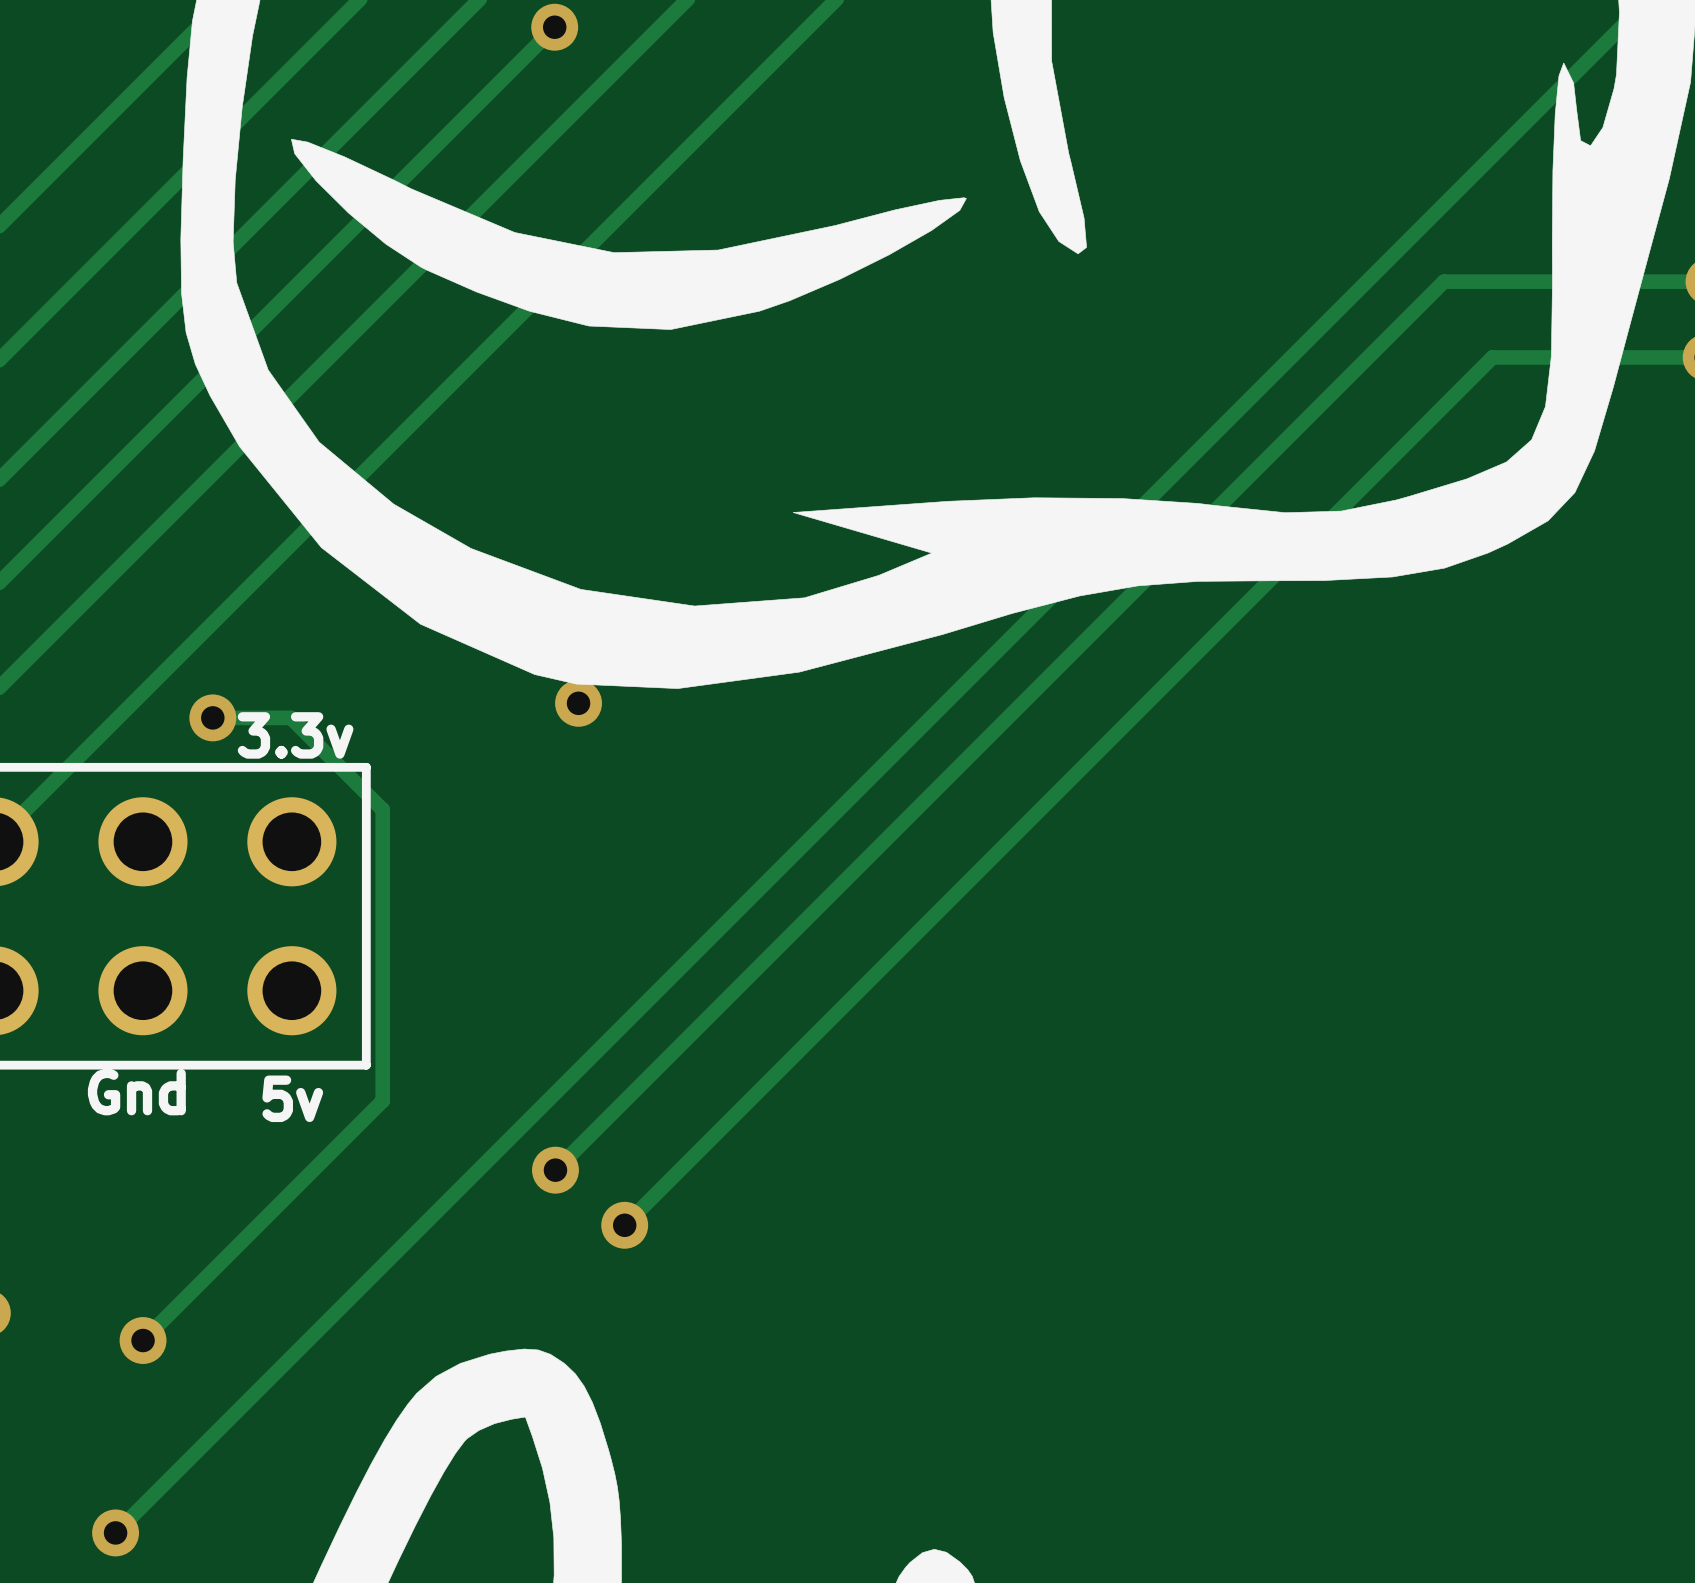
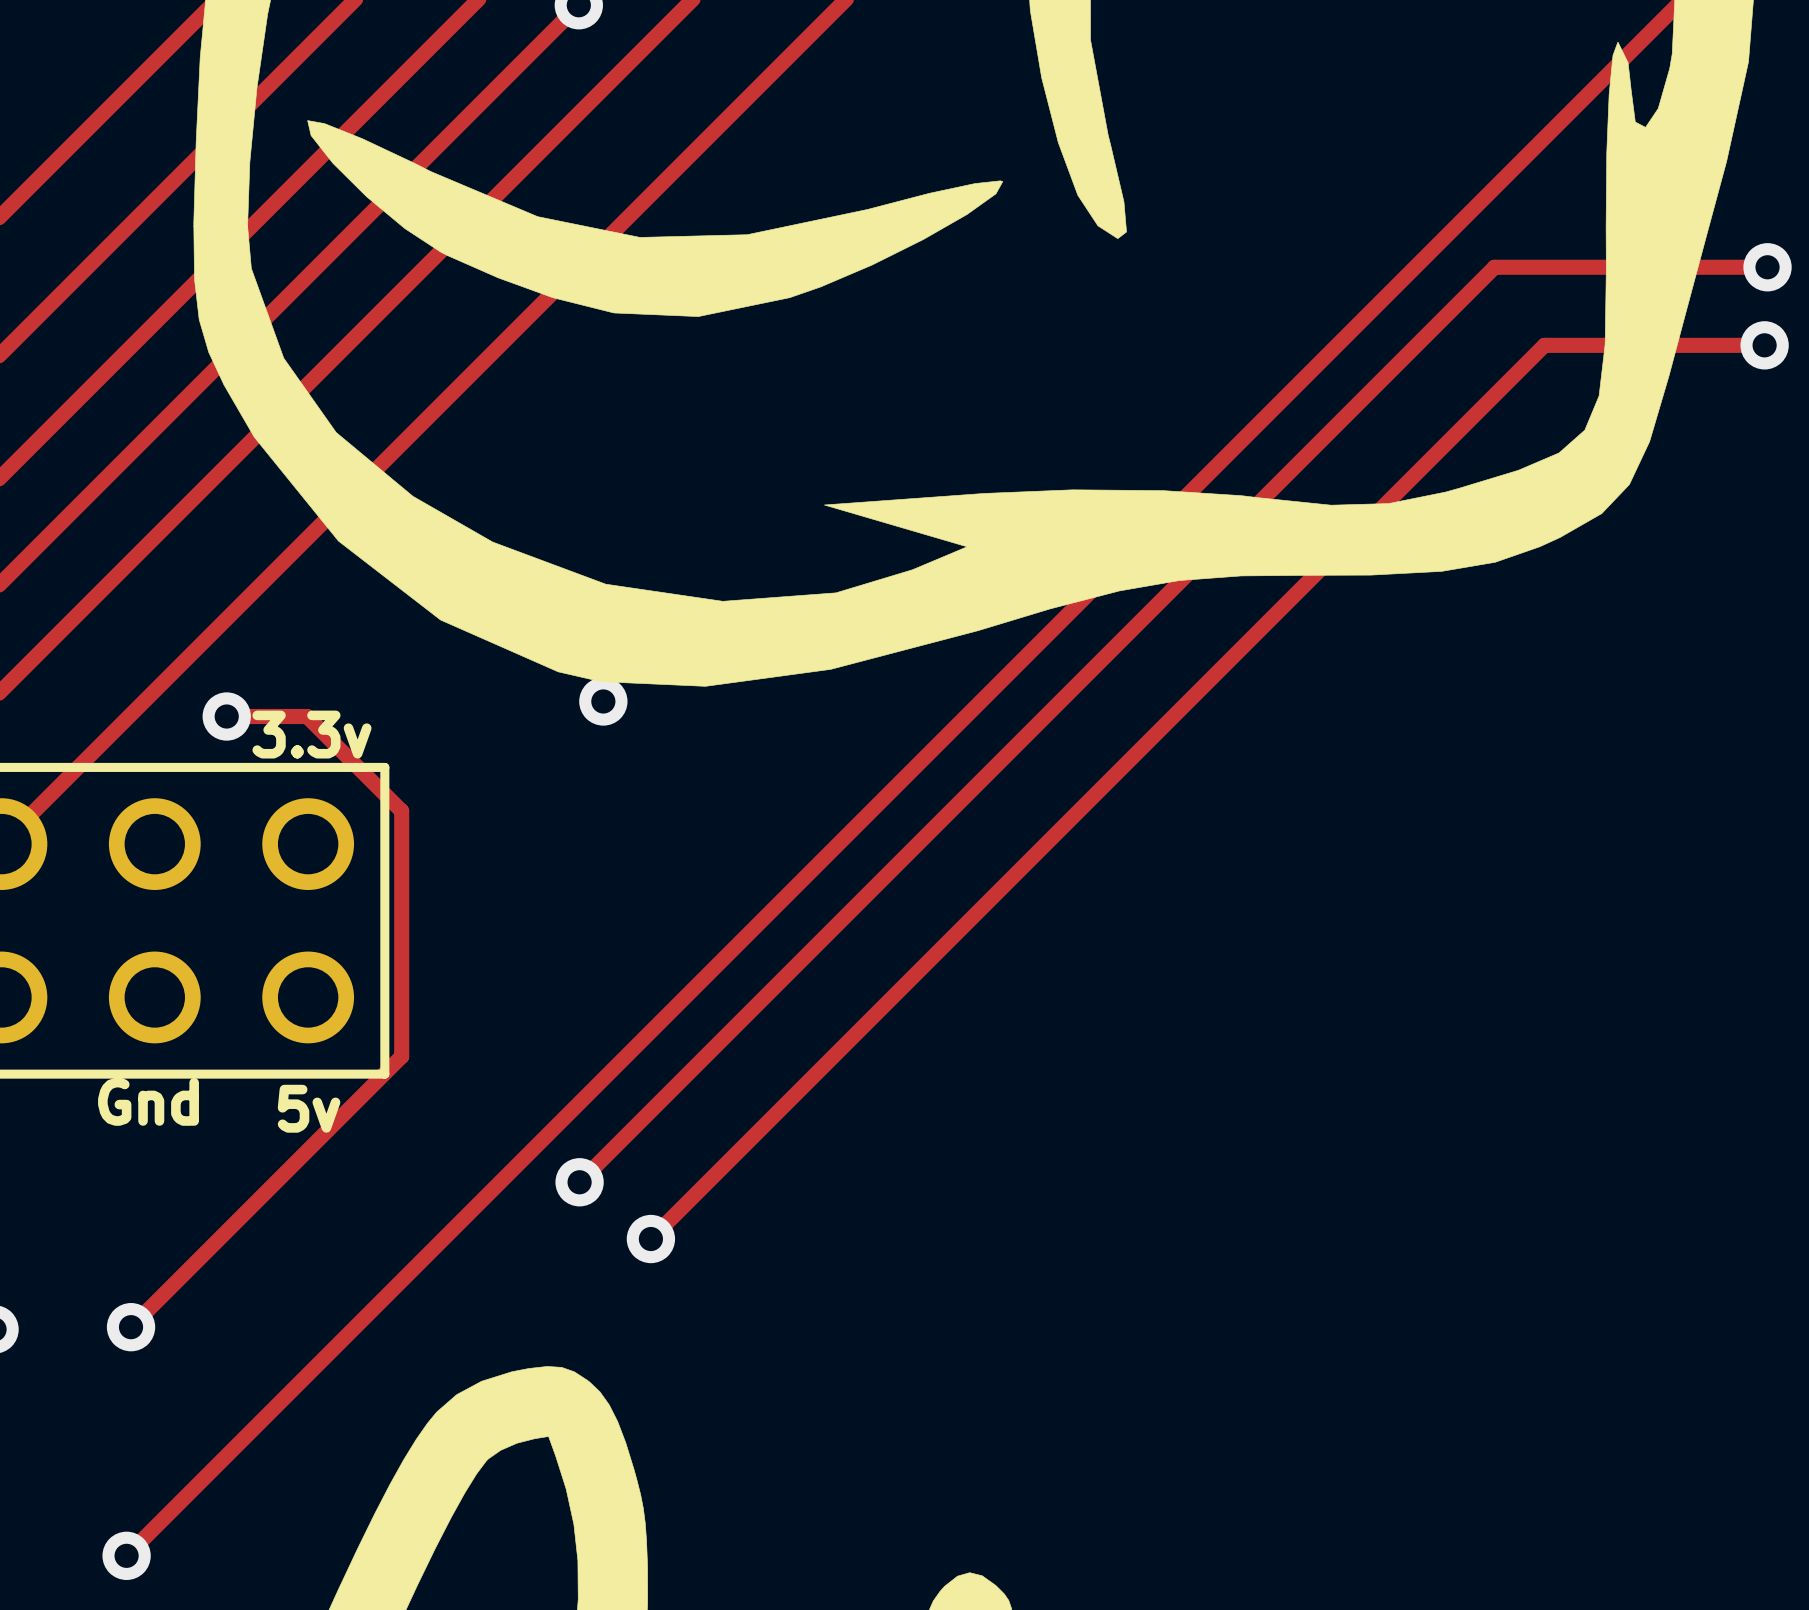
track: (382, 1048) (382, 1100) (143, 1340) -> (401, 1056) (131, 1327)
via position: (143, 1340) -> (131, 1327)

